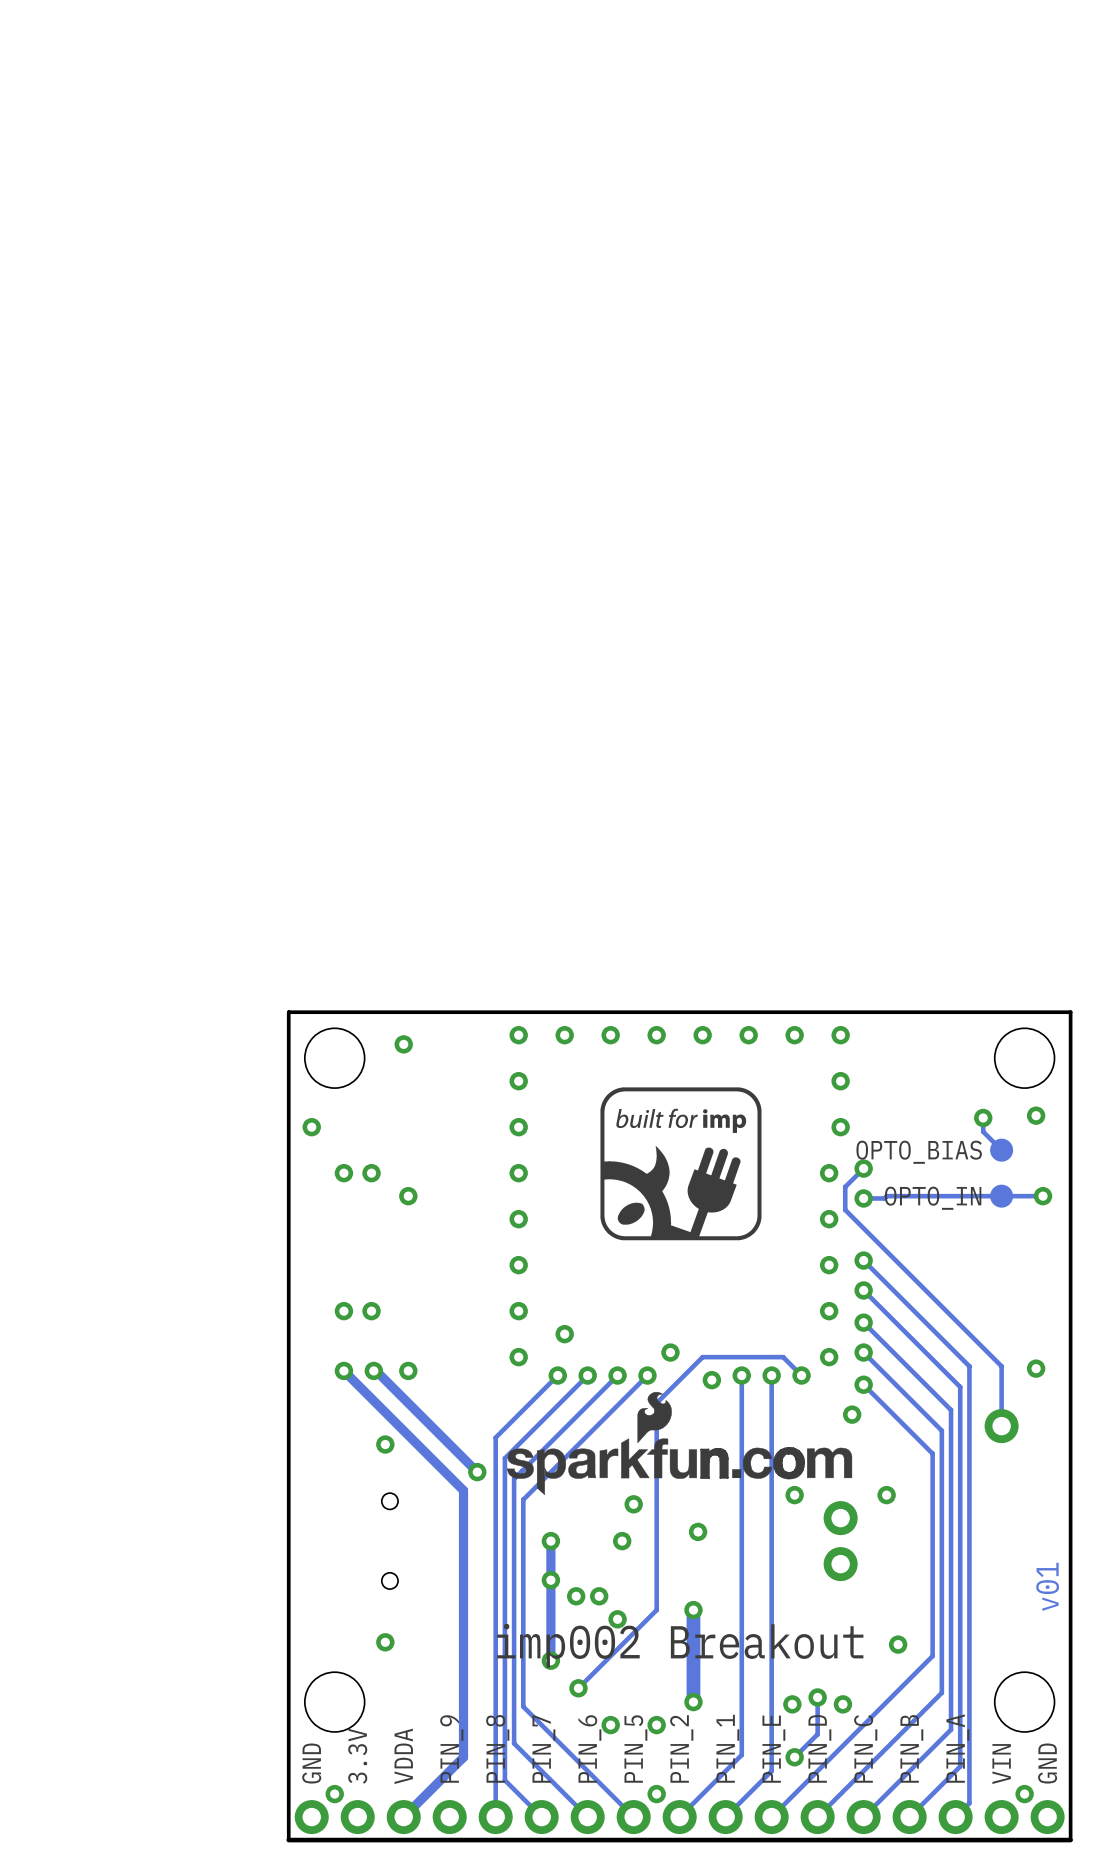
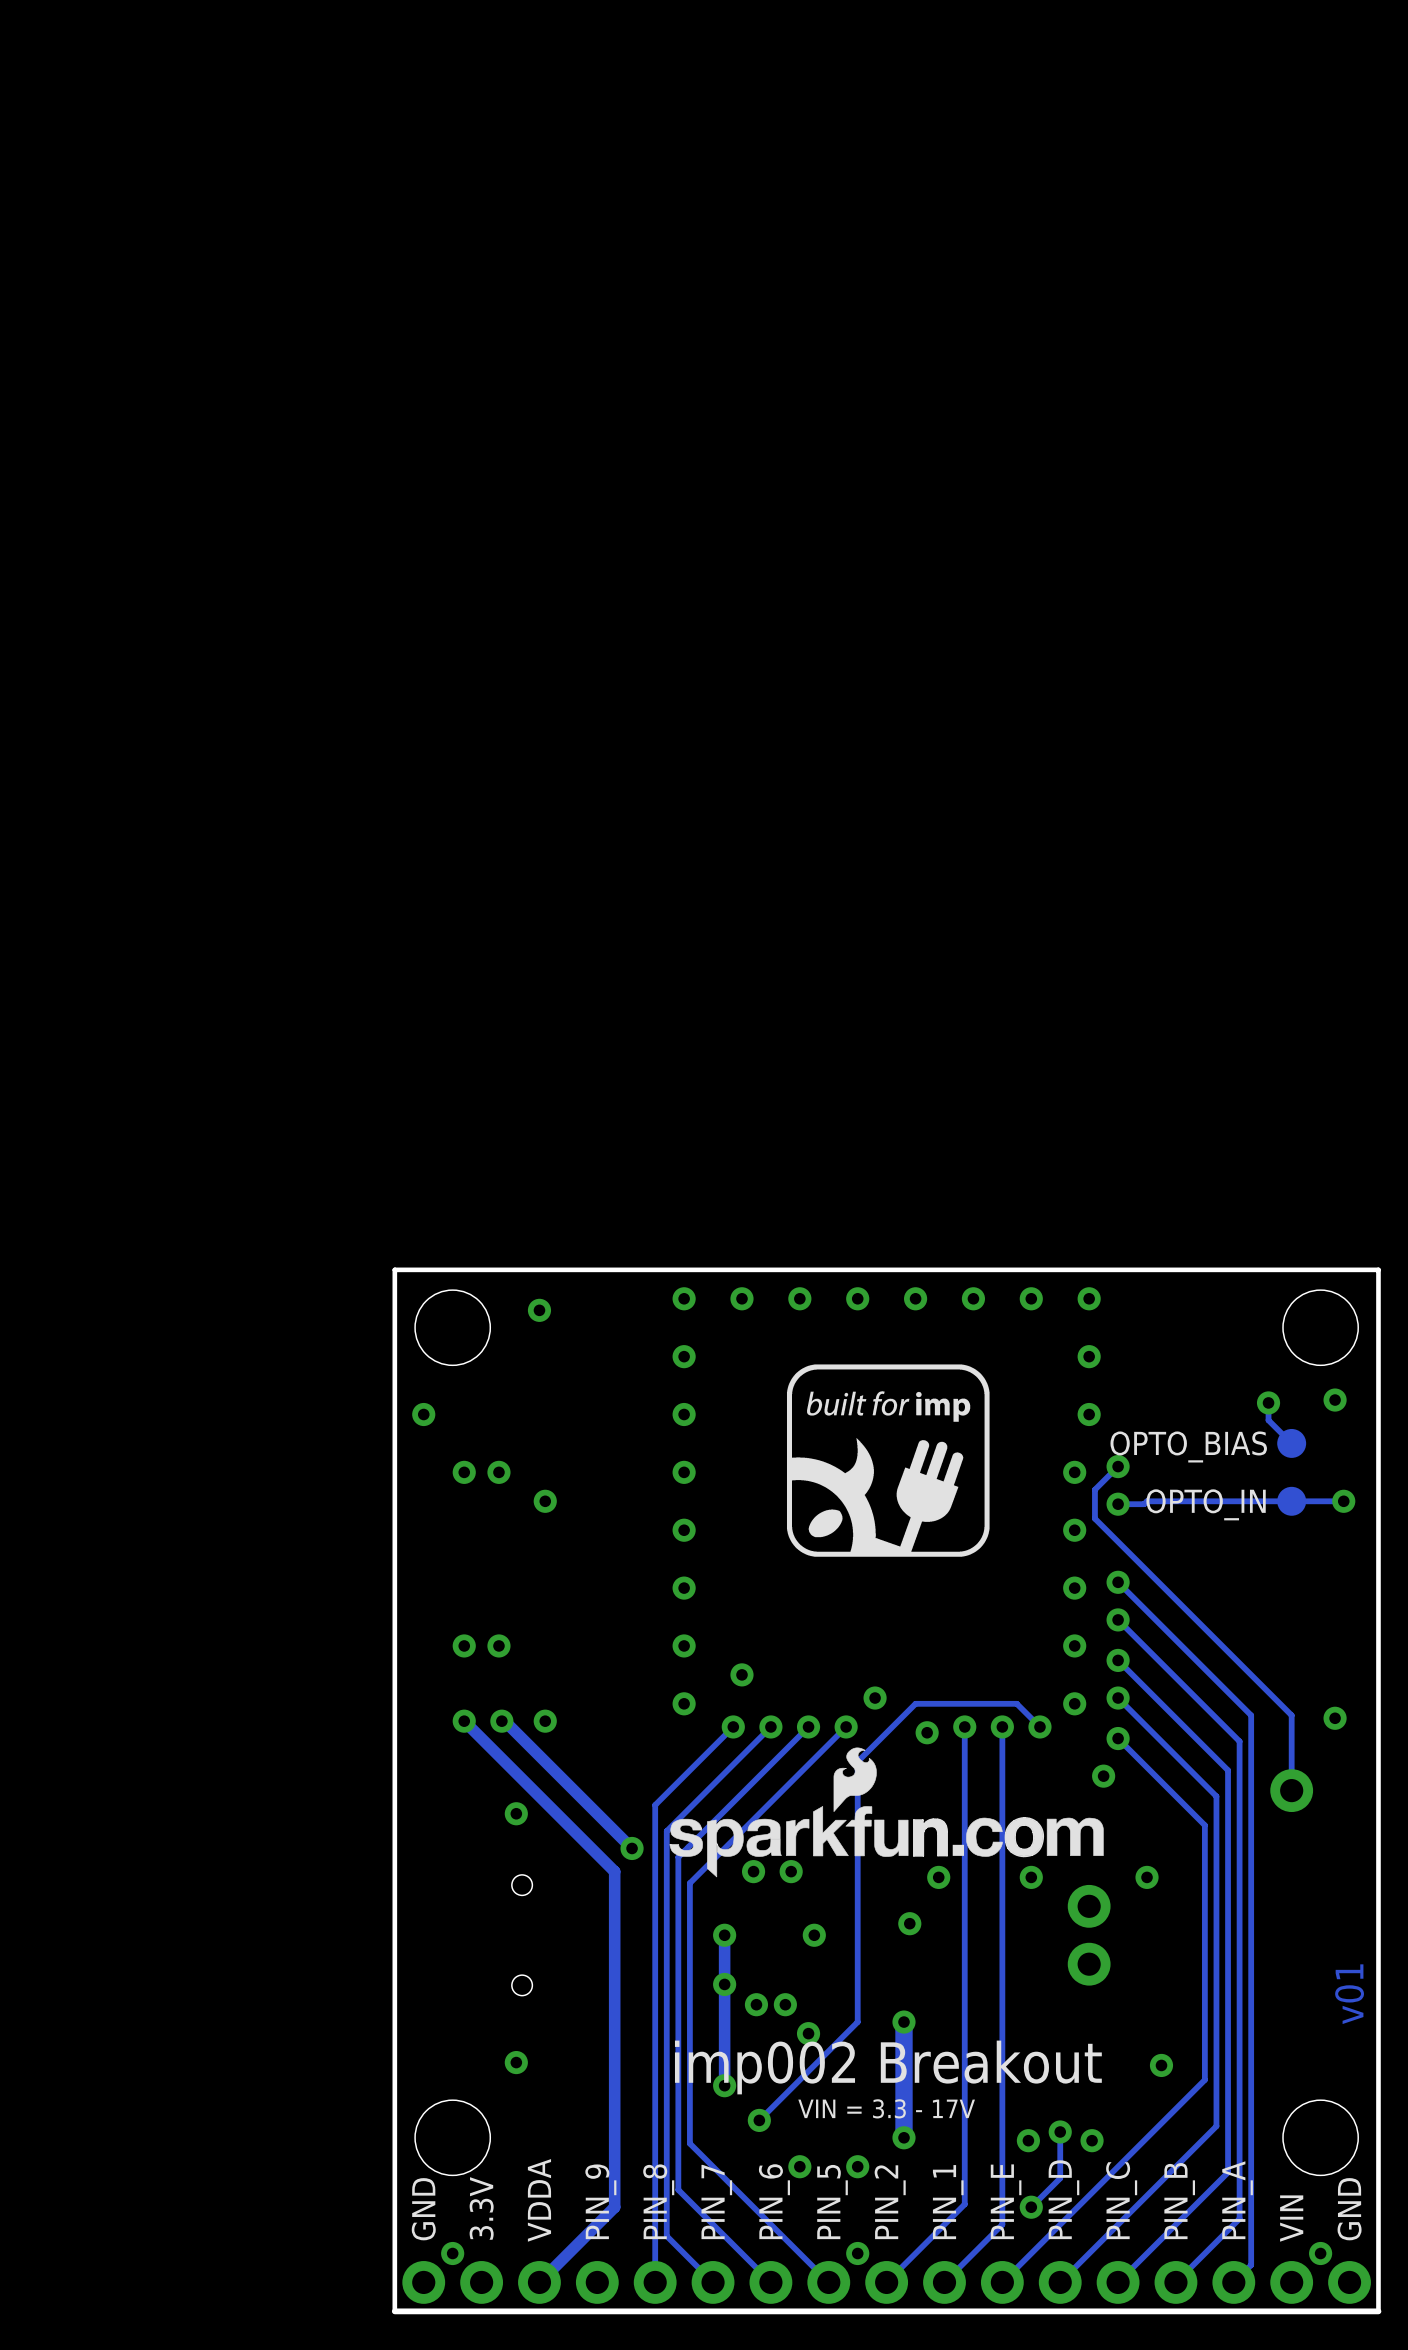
via: none -> (753, 1871)
via: none -> (791, 1871)
via: none -> (938, 1877)
via: (633, 1504) -> none
text: none -> VIN = 3.3 - 17V (886, 2108)

